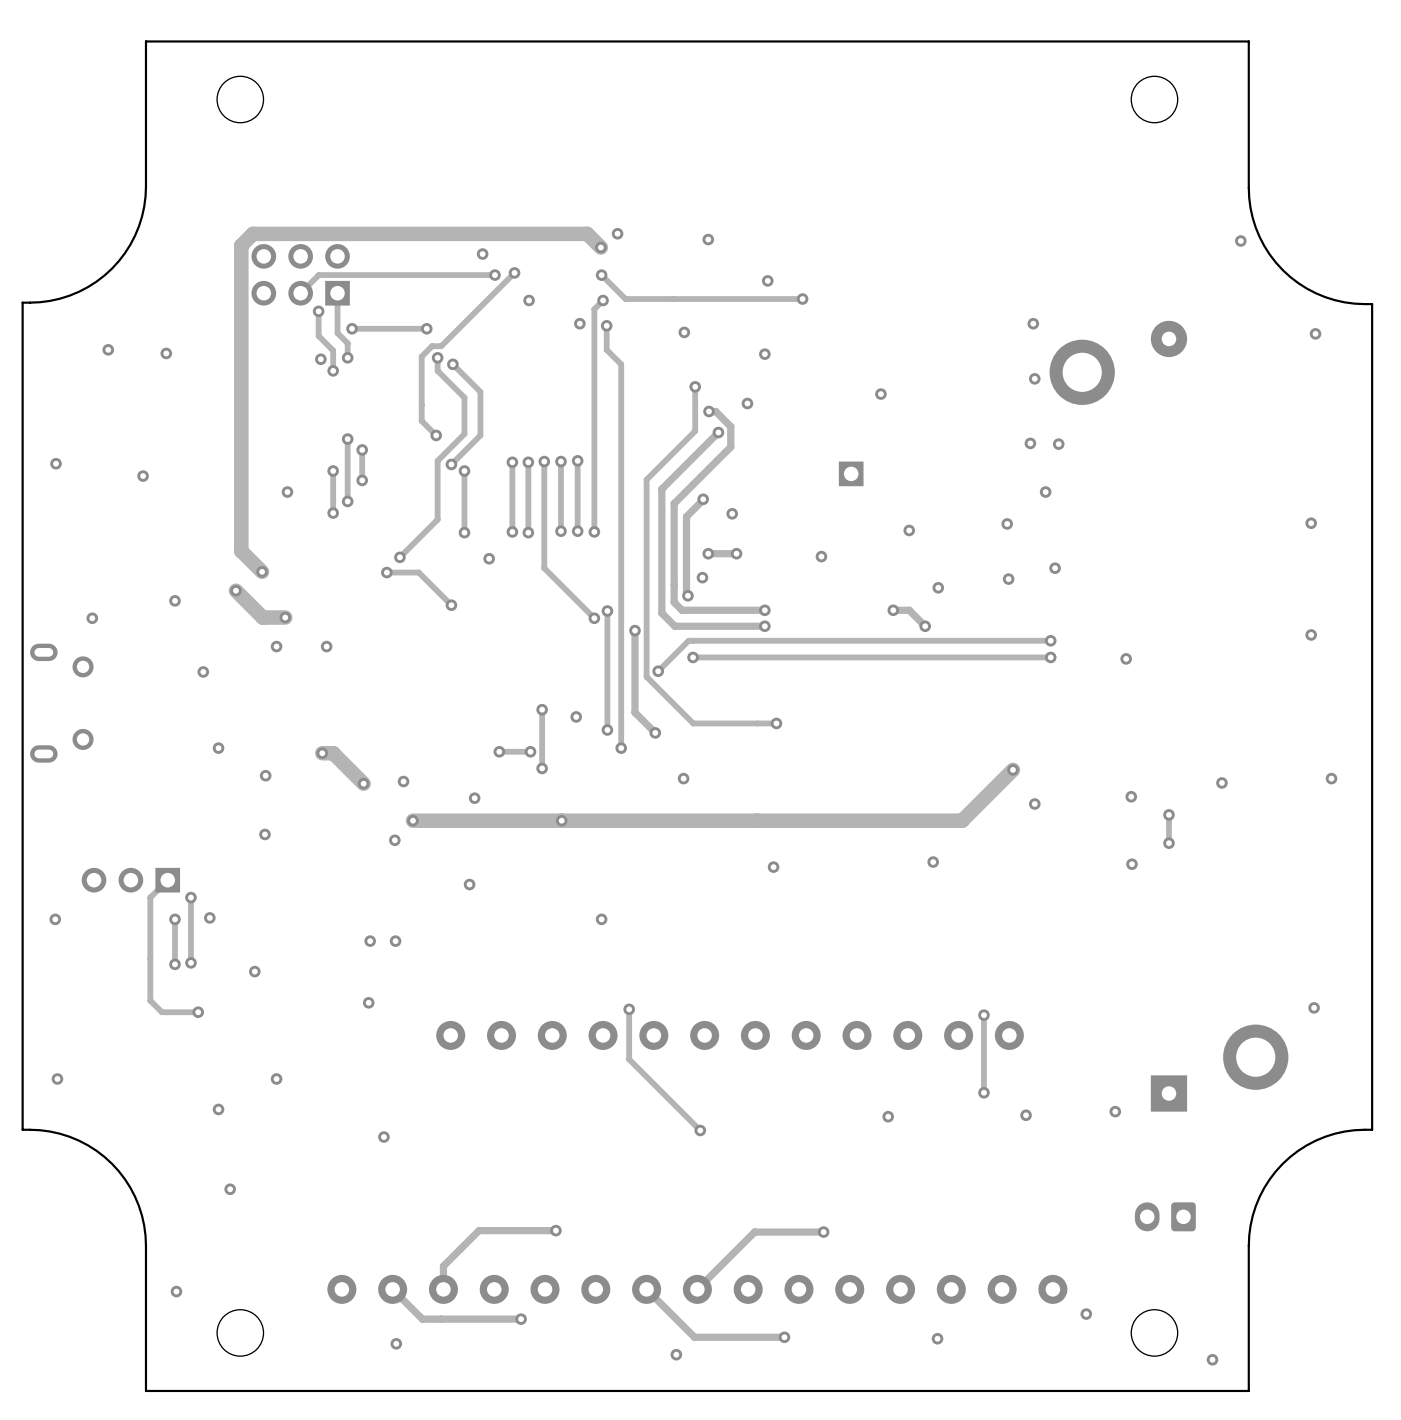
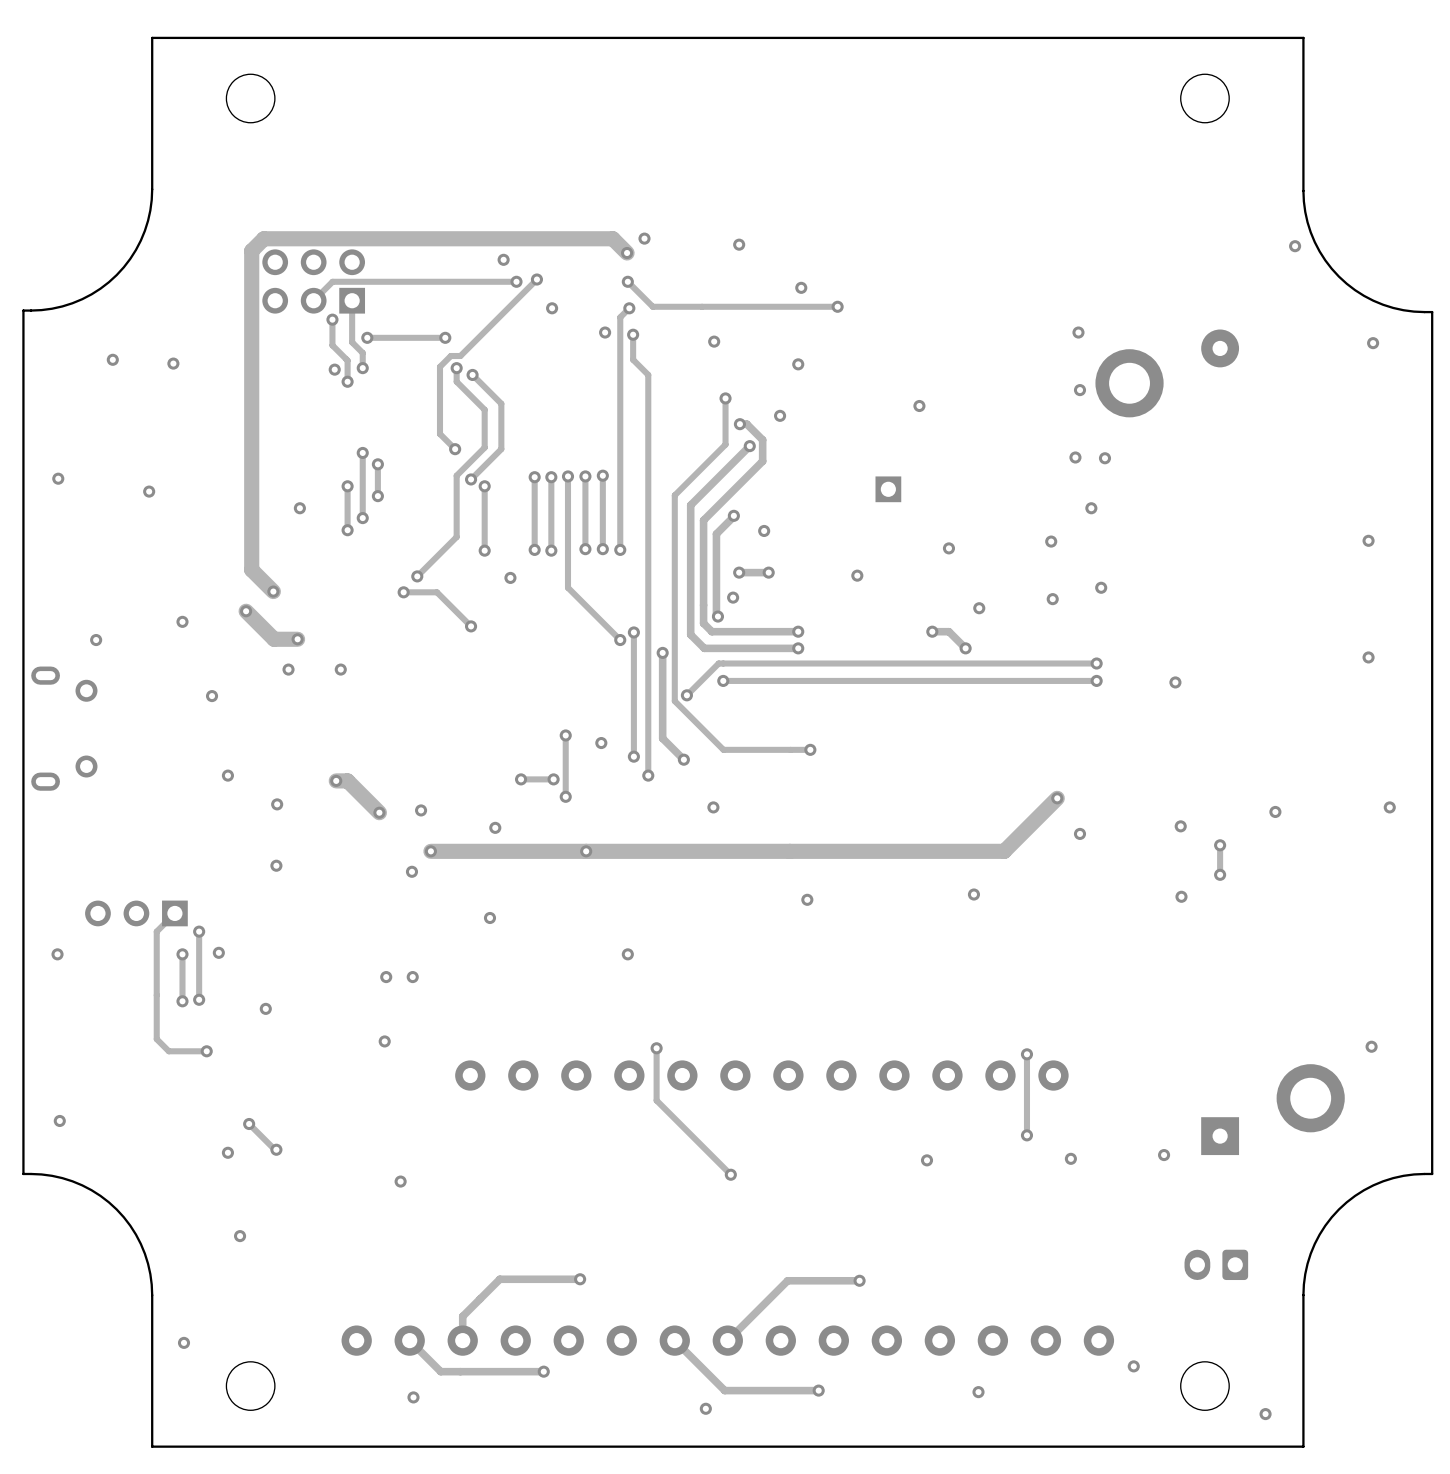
via: (276, 1078) -> none
track: none -> (249, 1124) (276, 1149)
via: none -> (249, 1124)
via: none -> (276, 1149)

